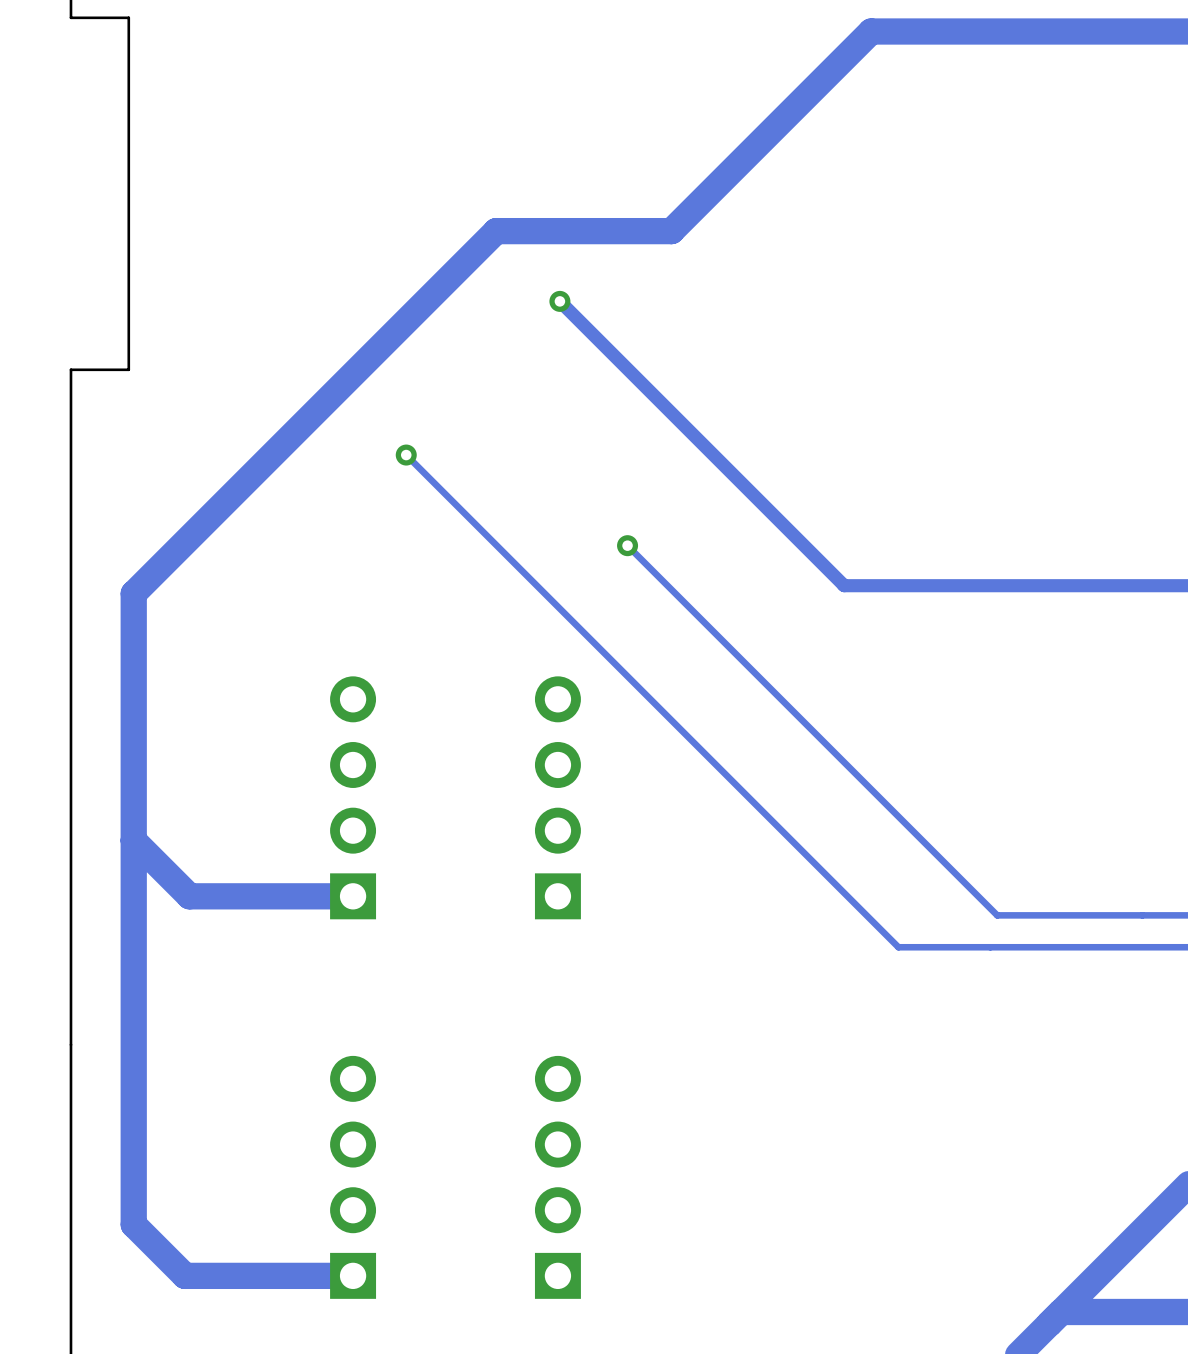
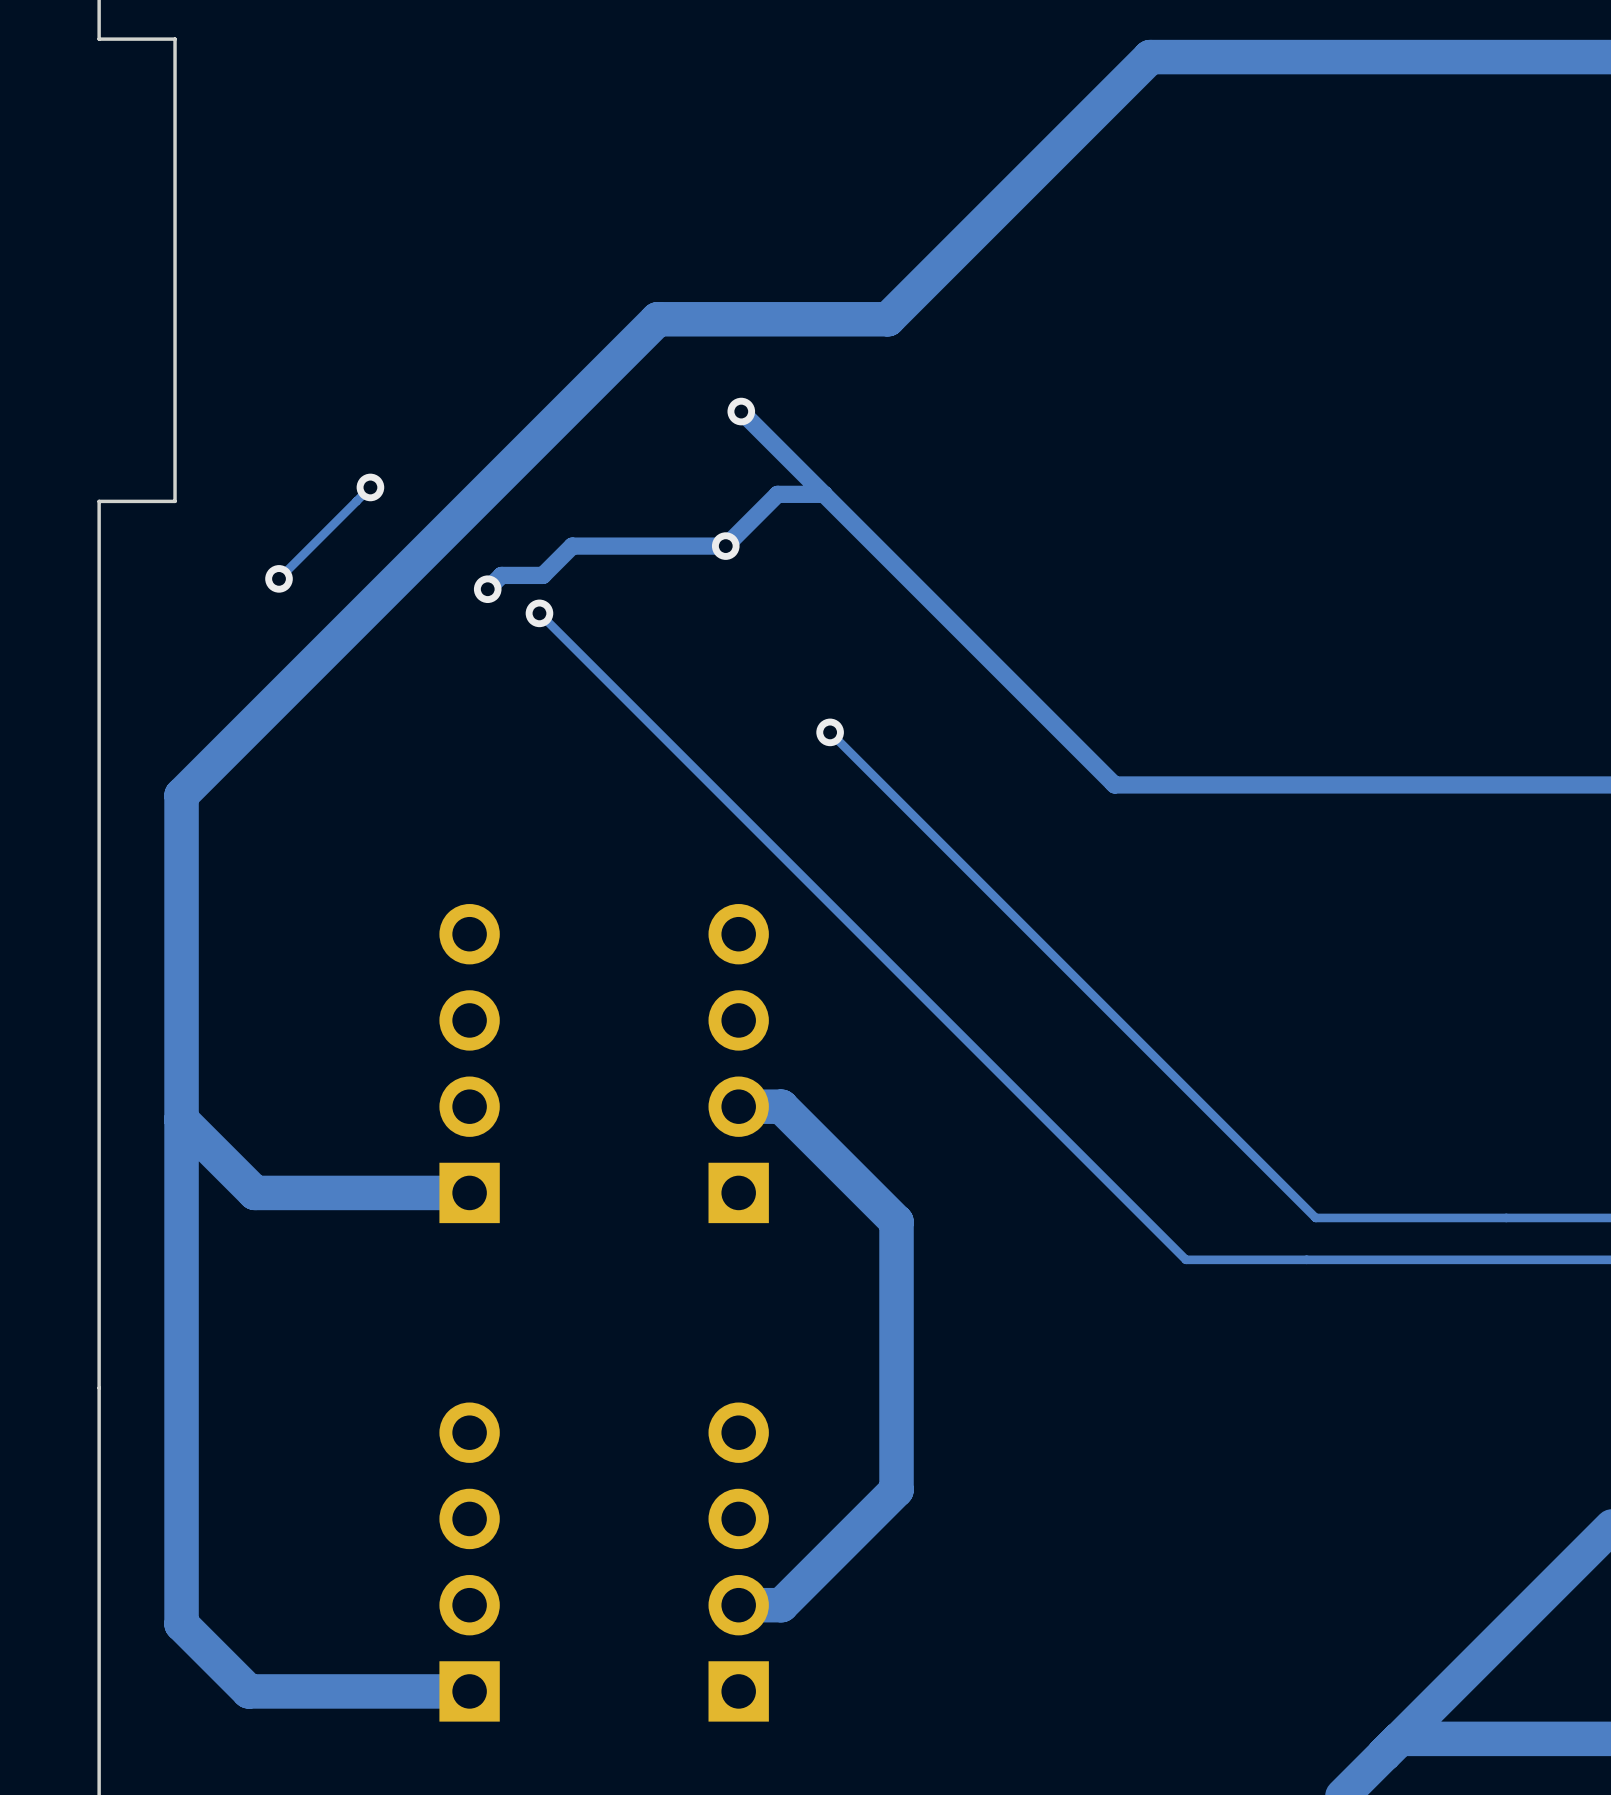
track: none -> (370, 487) (279, 578)
via: none -> (370, 487)
track: none -> (824, 494) (777, 494) (725, 546) (572, 546) (542, 575) (501, 575) (487, 589)
via: none -> (725, 546)
via: none -> (279, 578)
via: none -> (487, 589)
track: none -> (738, 1106) (781, 1106) (896, 1221) (896, 1490) (781, 1605) (738, 1605)

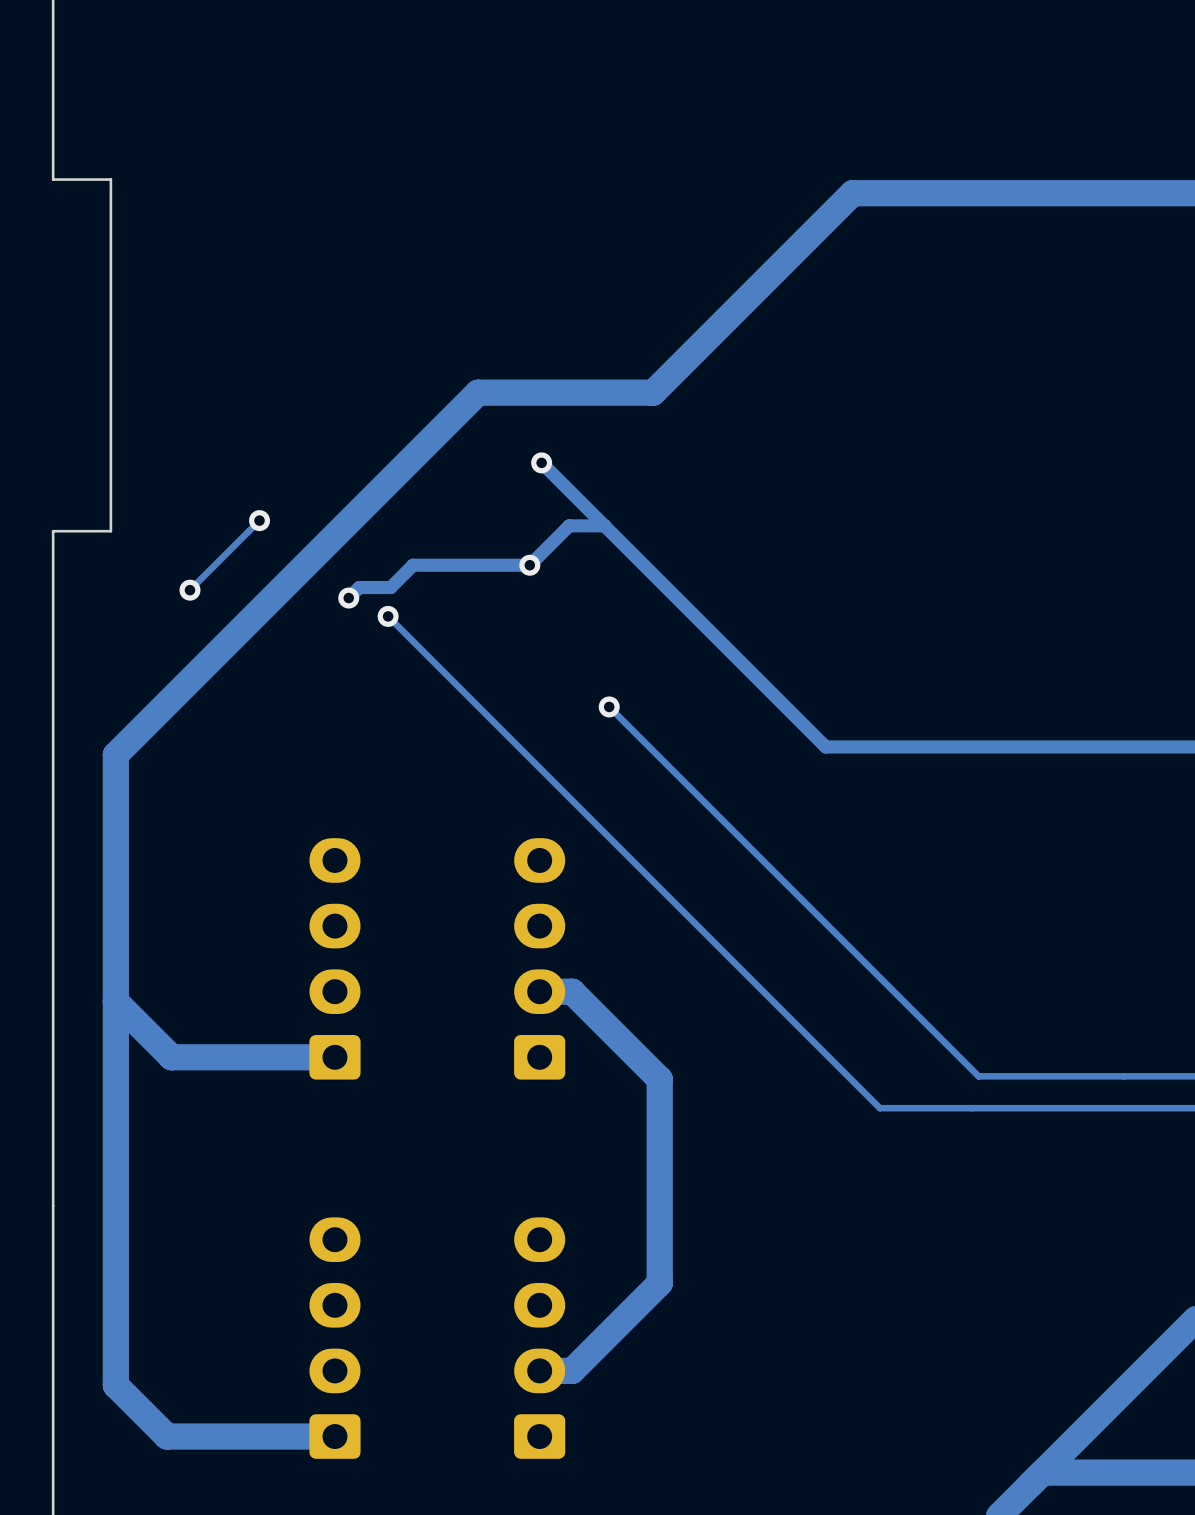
part footprint: [439, 904, 500, 1224] -> [309, 838, 361, 1080]
part footprint: [708, 904, 769, 1224] -> [514, 838, 566, 1080]
part footprint: [439, 1402, 500, 1722] -> [309, 1217, 361, 1459]
part footprint: [708, 1402, 769, 1722] -> [514, 1217, 566, 1459]

